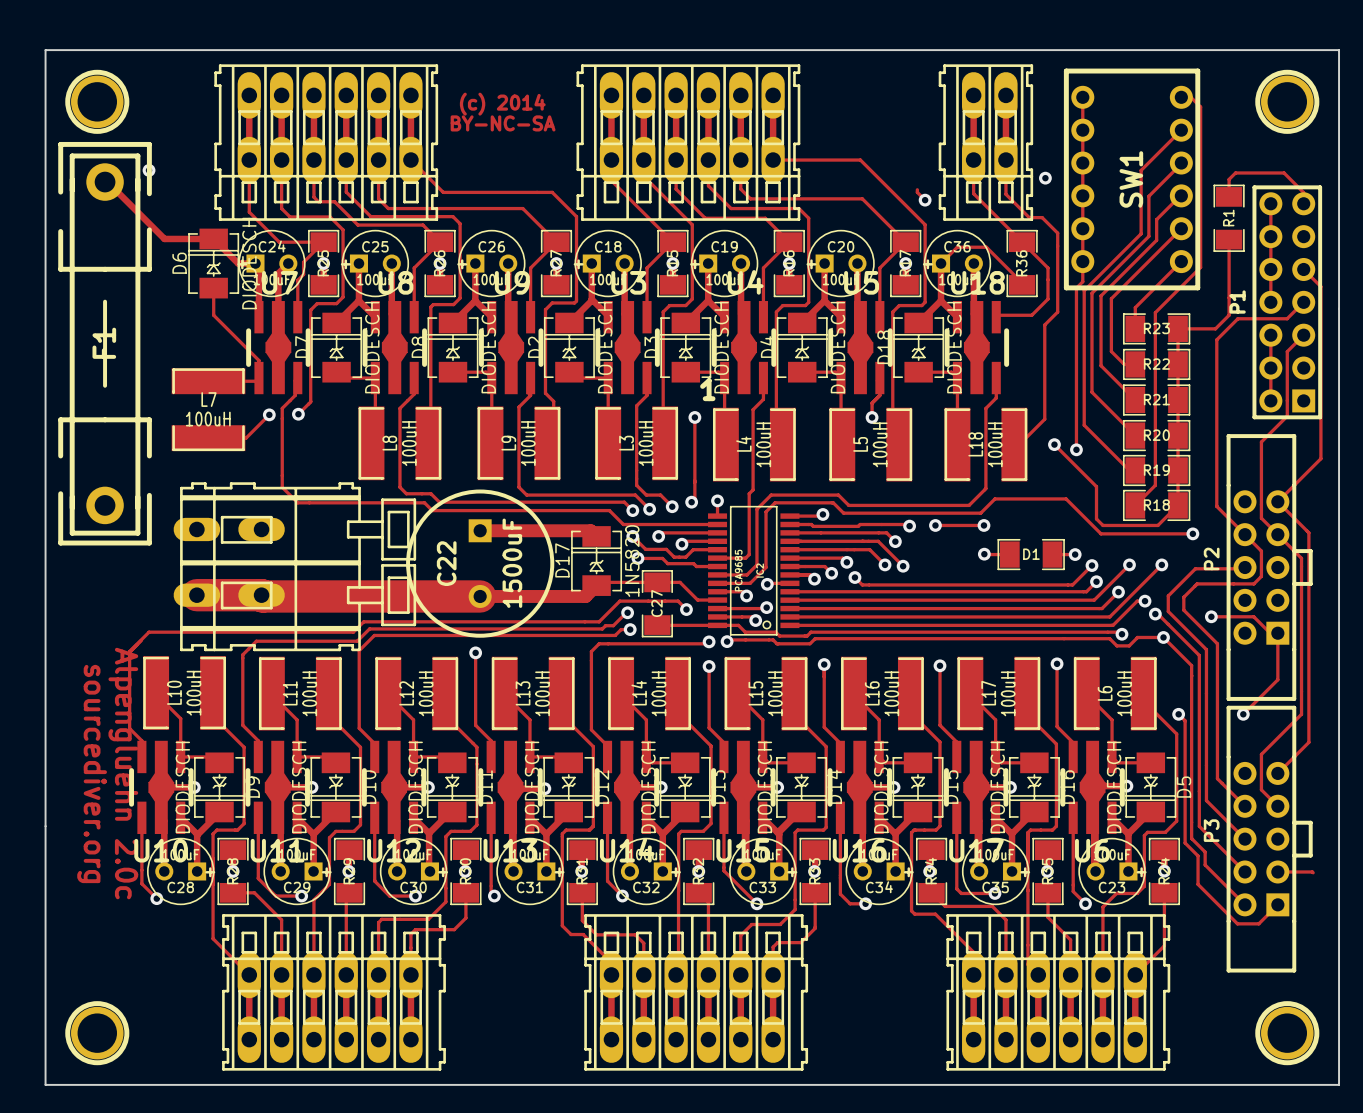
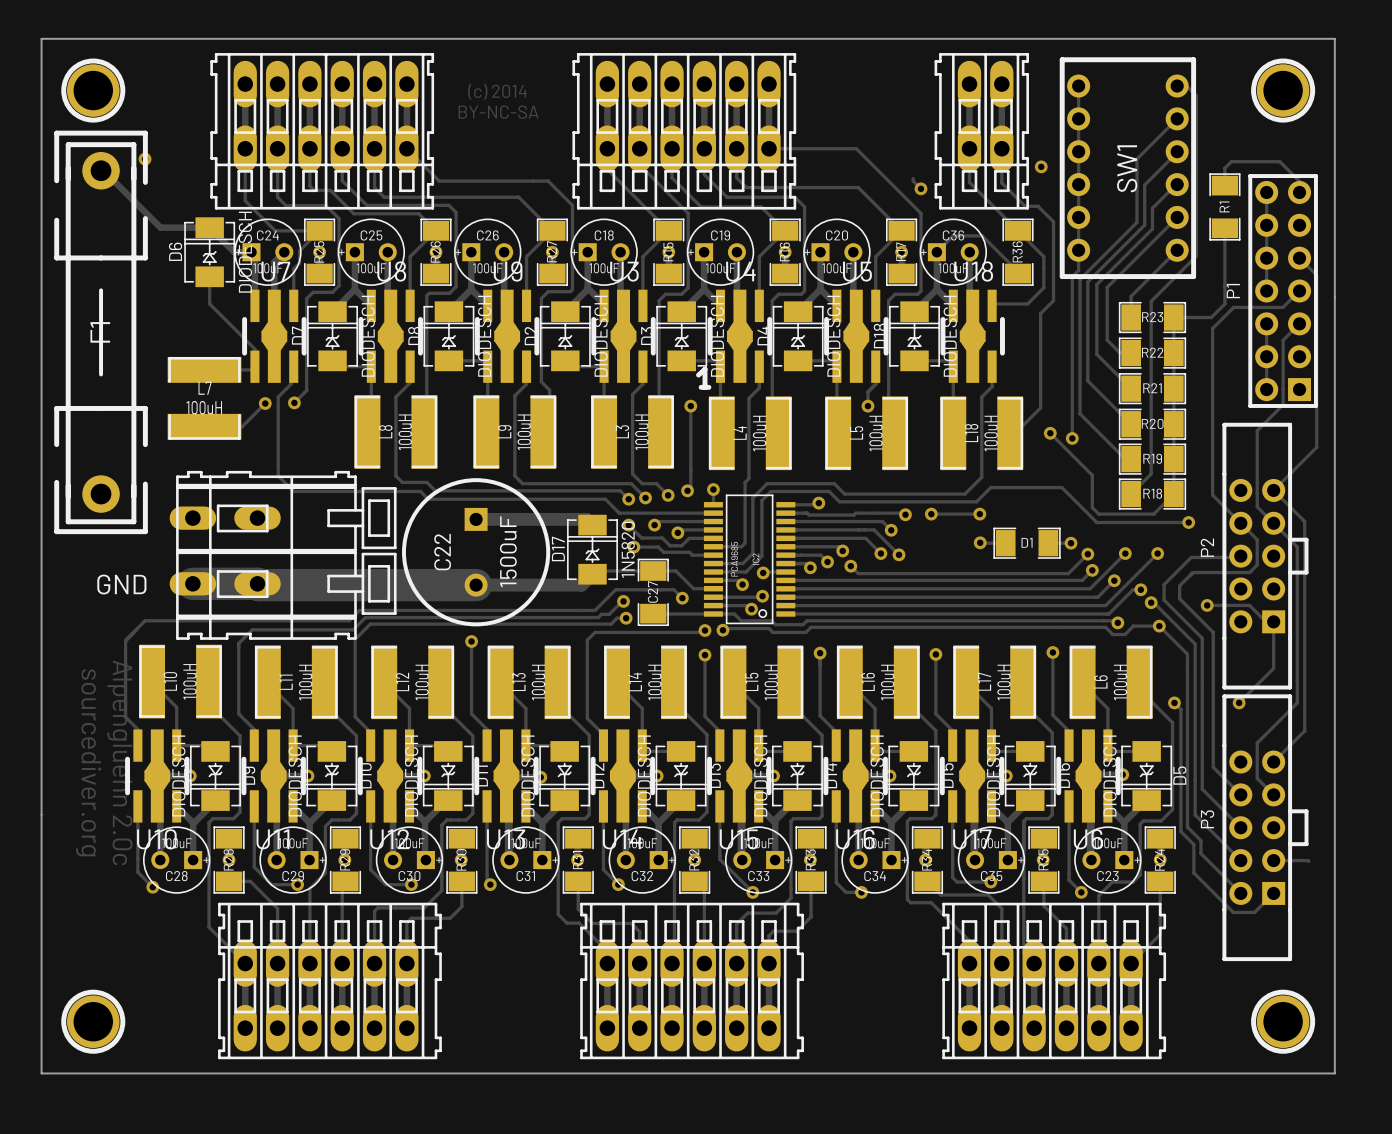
part footprint: [173, 482, 417, 652] -> [169, 470, 397, 640]
text: none -> GND (121, 584)

